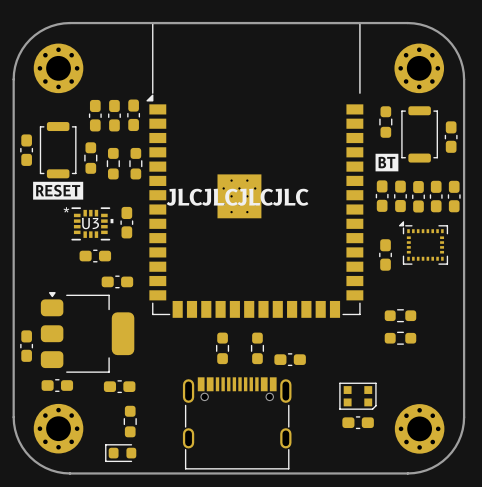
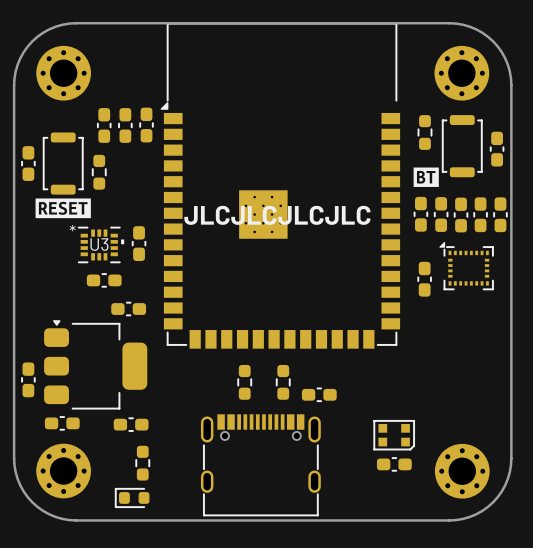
part: (113, 163) -> none
part: (135, 163) -> none
part: (400, 315) -> none
part: (400, 338) -> none

